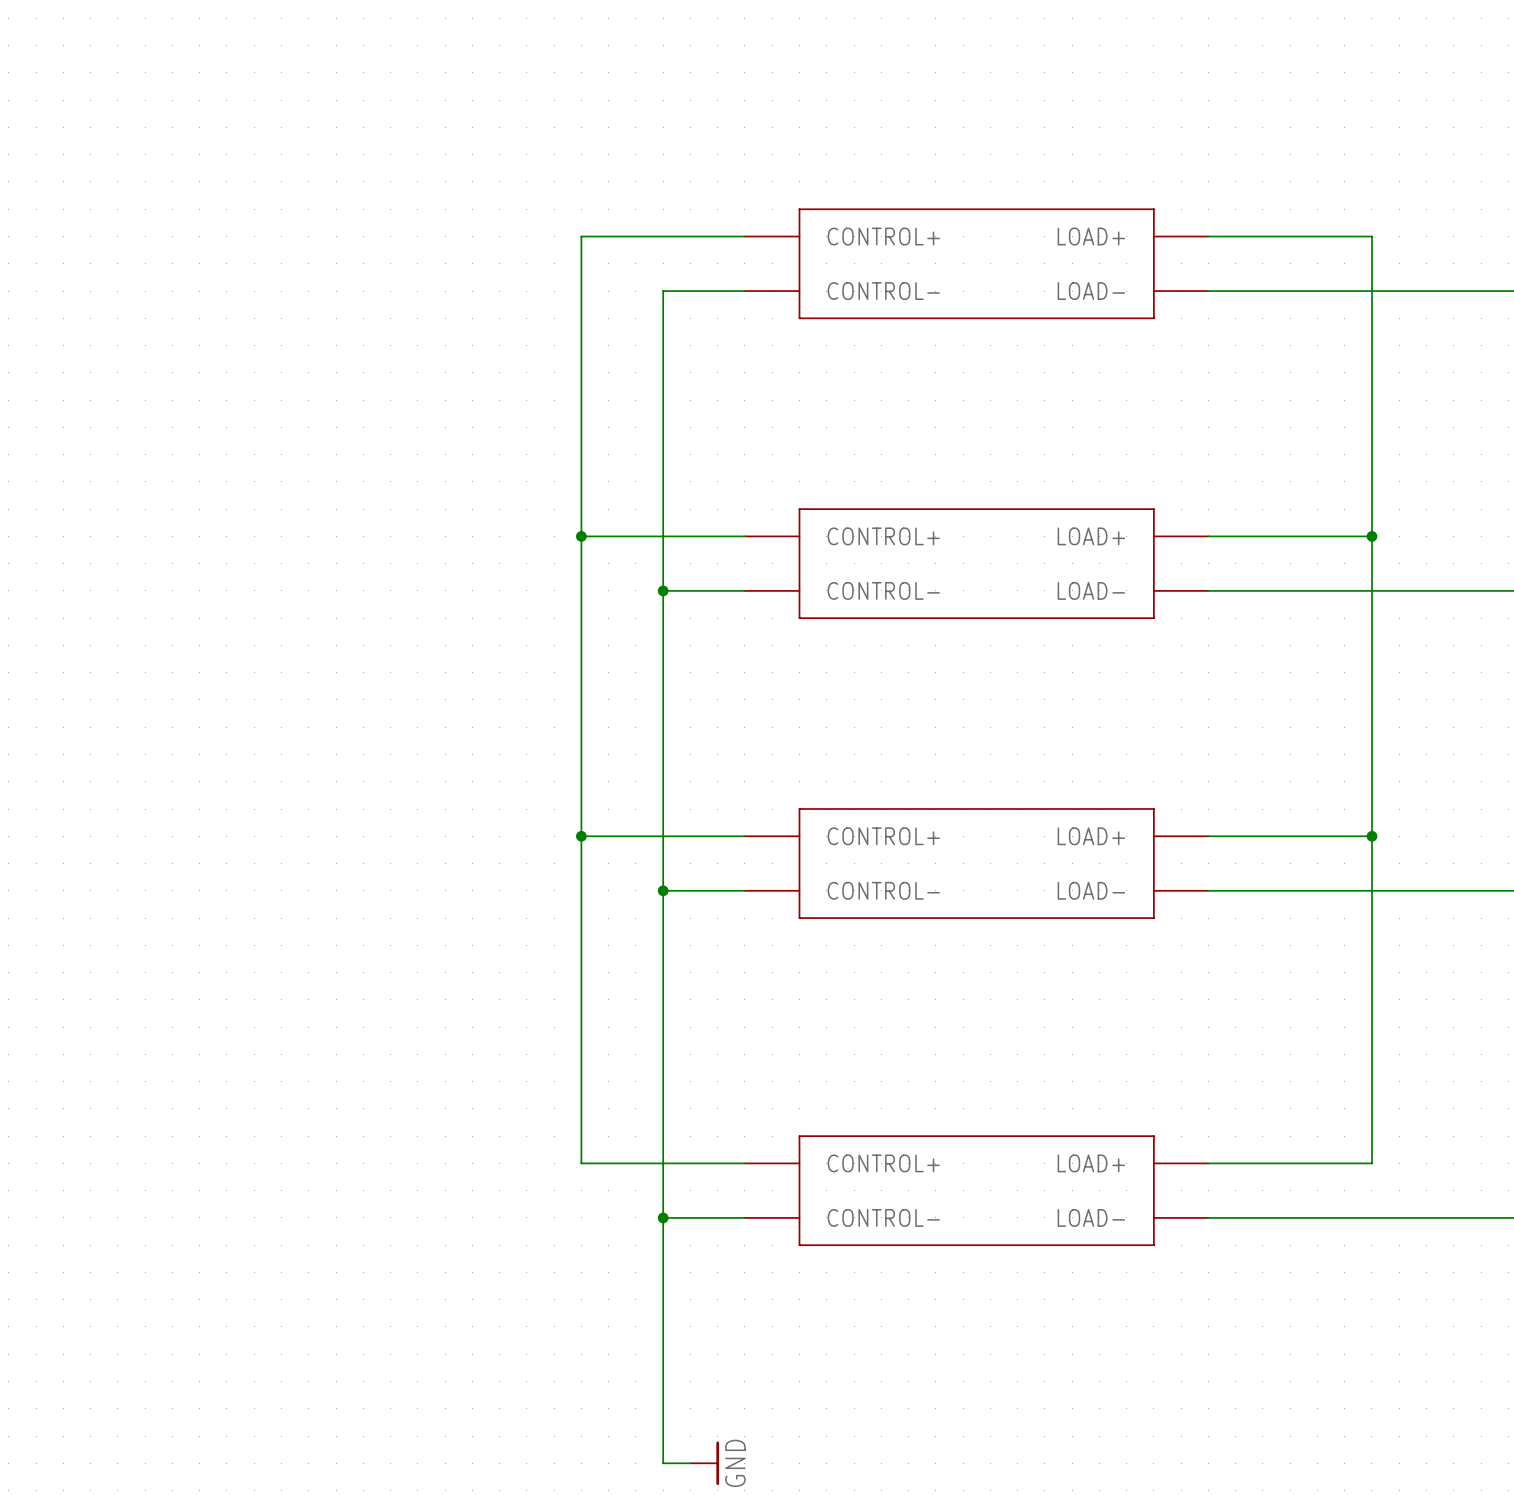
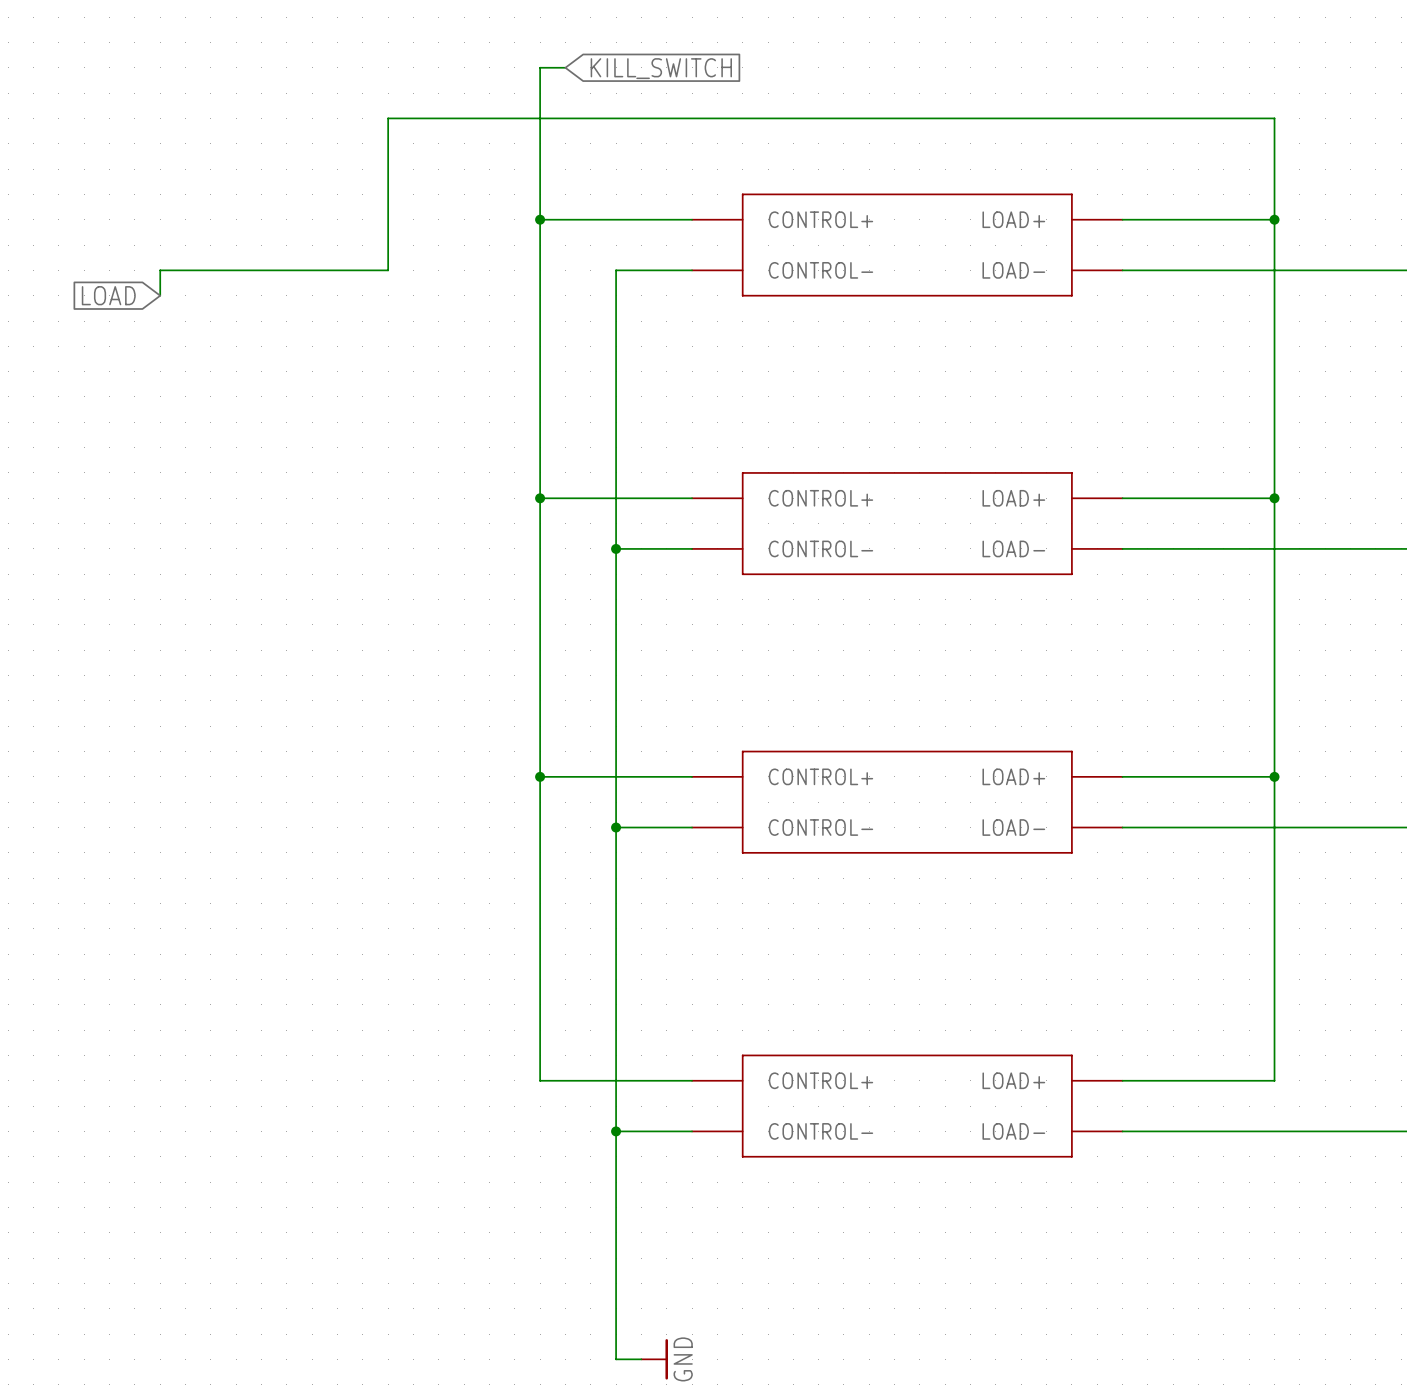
wire: none -> (565, 67) (540, 67) (540, 219)
global label: none -> KILL_SWITCH (661, 68)
junction: none -> (540, 219)
wire: none -> (1274, 219) (1274, 118) (388, 118) (388, 270) (160, 270) (160, 295)
junction: none -> (1274, 219)
global label: none -> LOAD (108, 295)

